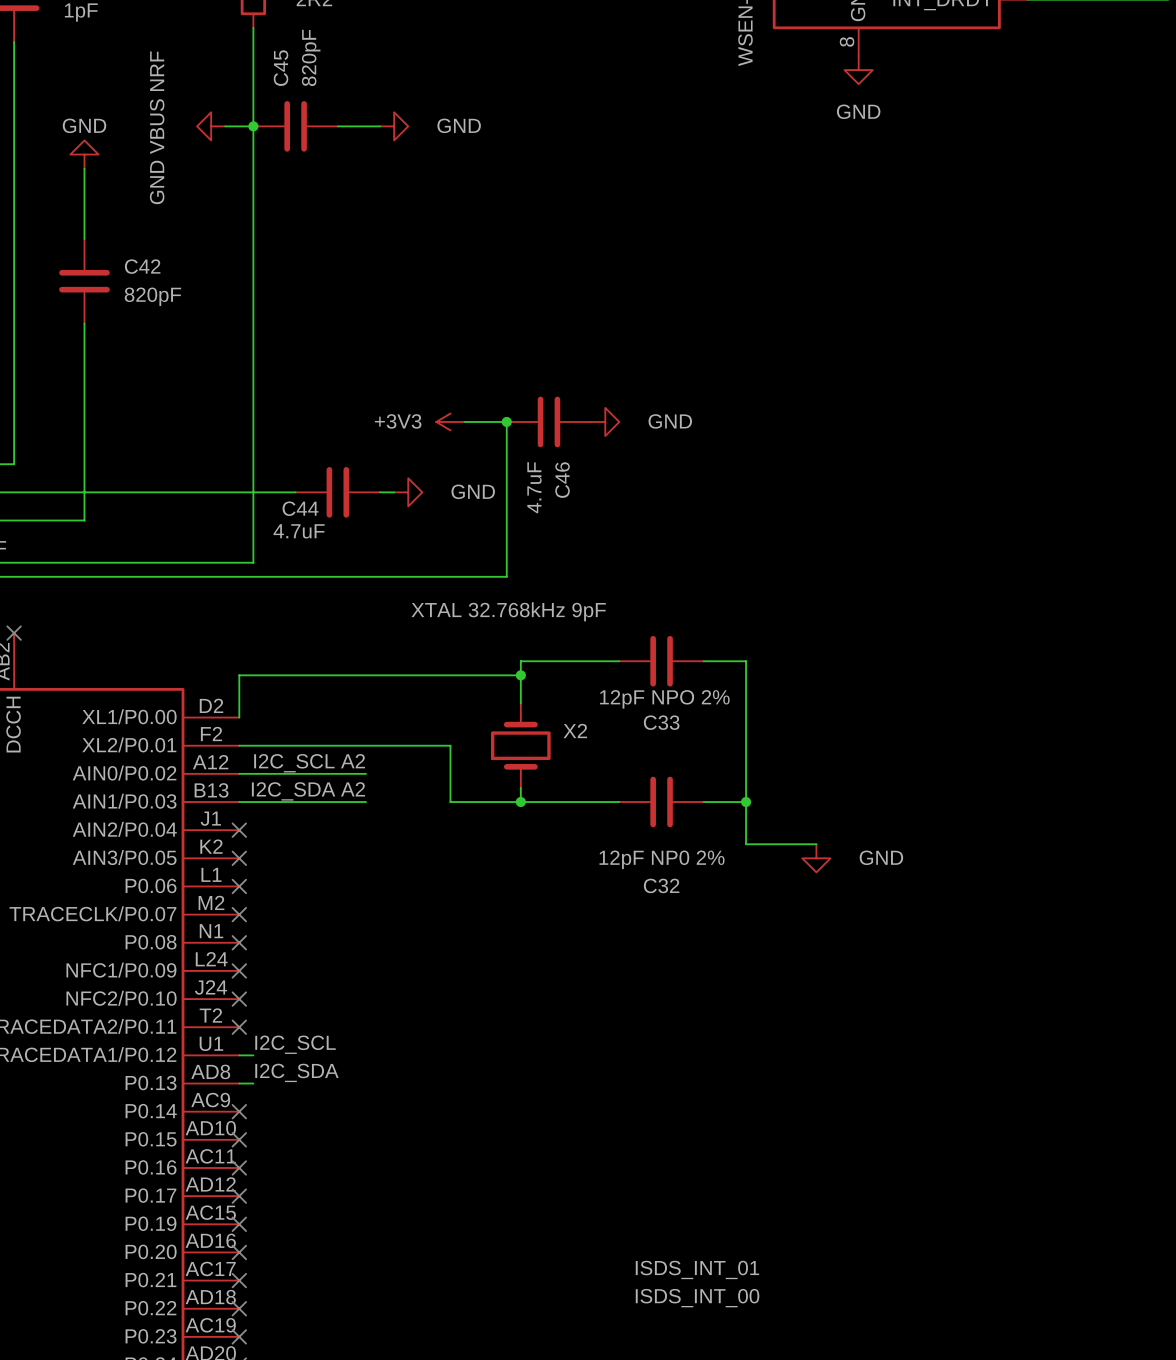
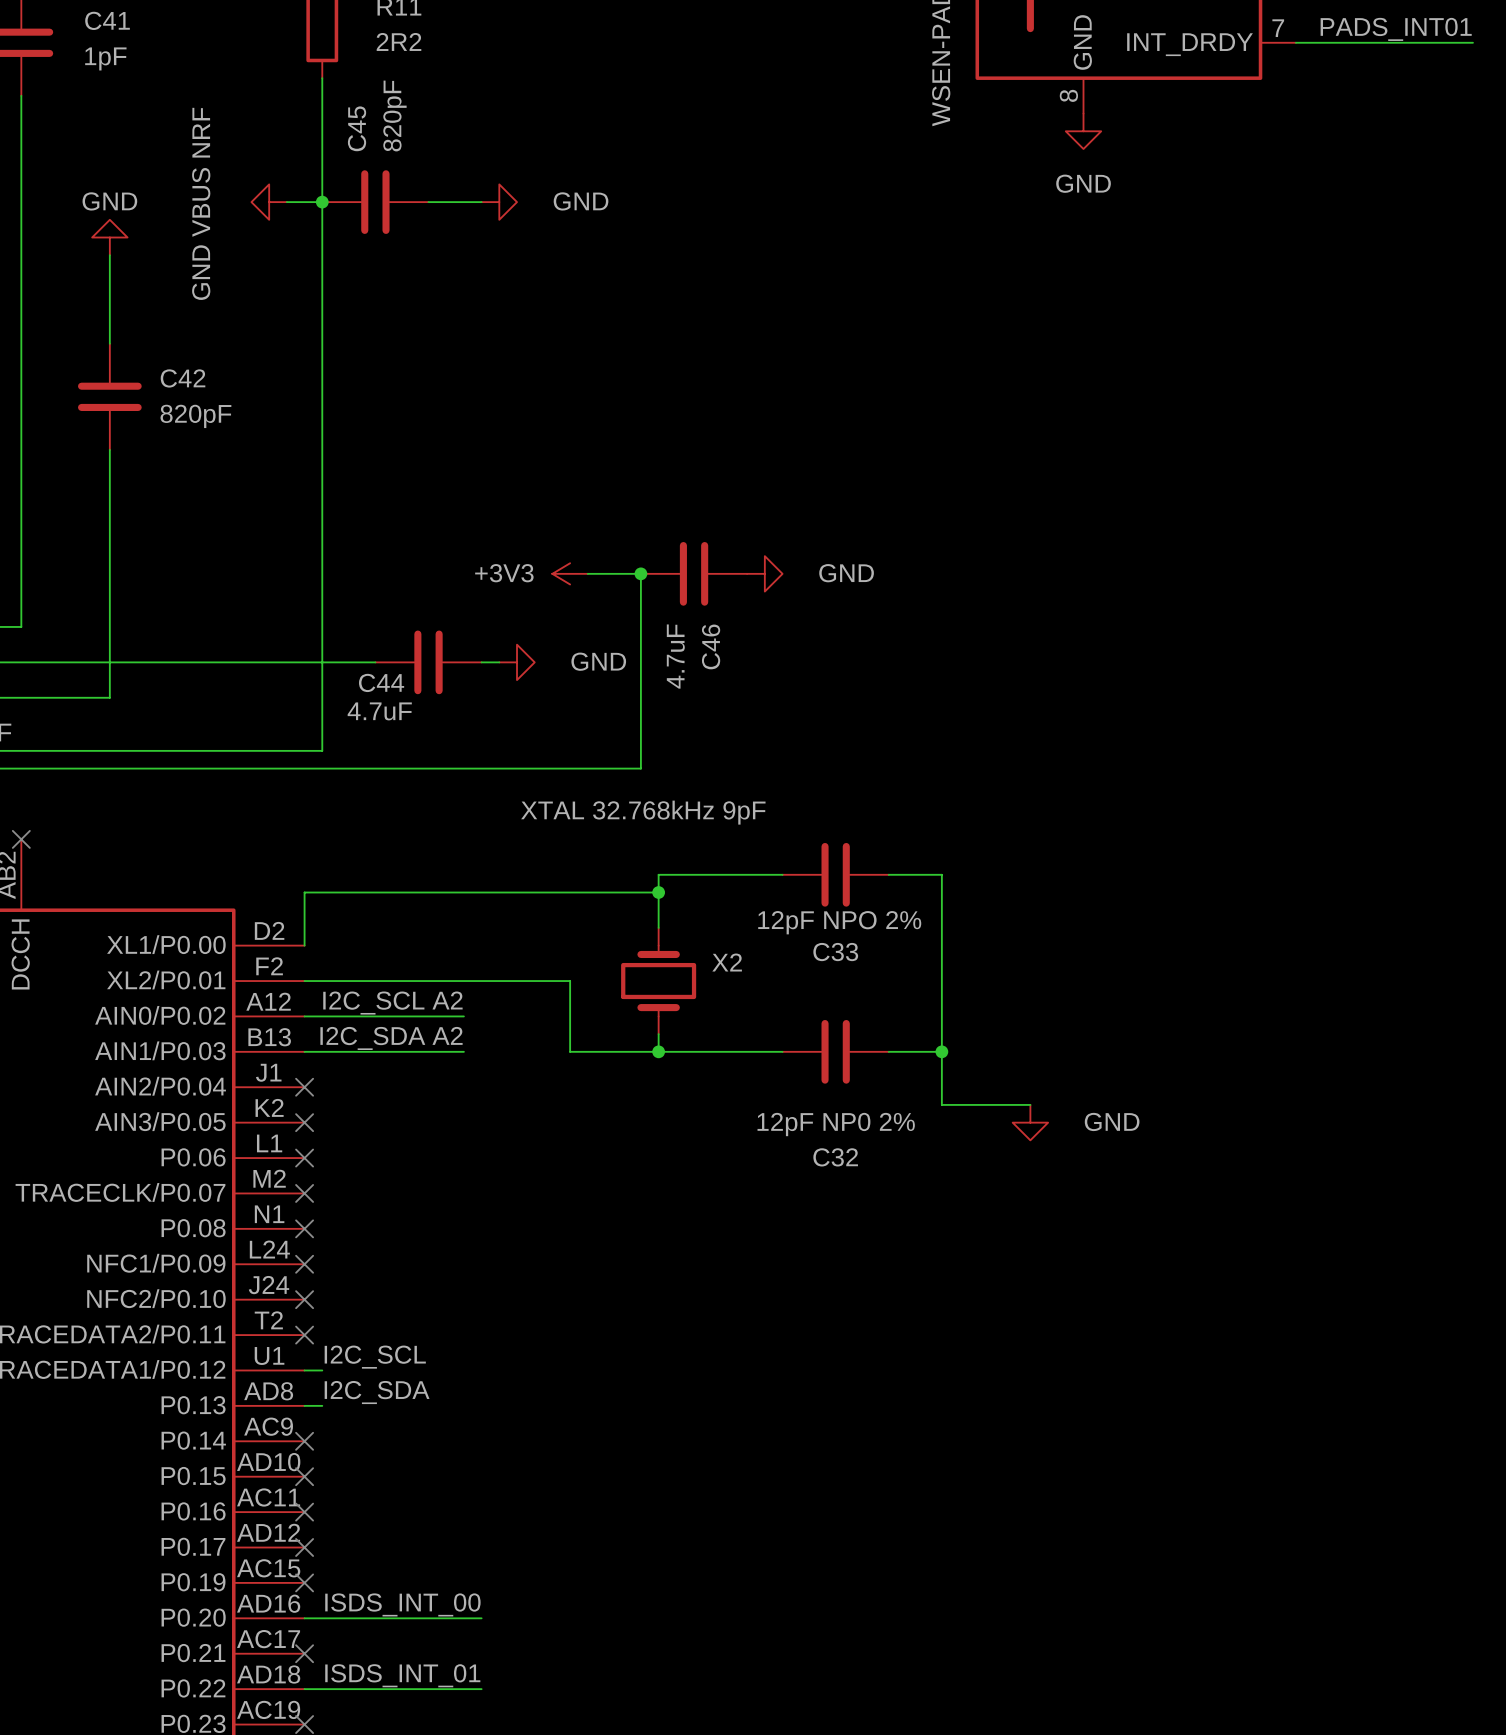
label: none -> ISDS_INT_00 (402, 1604)
wire: none -> (304, 1618) (481, 1618)
no-connect mark: (239, 1252) -> none
label: ISDS_INT_01 (697, 1269) -> none
label: none -> ISDS_INT_01 (402, 1675)
label: ISDS_INT_00 (697, 1298) -> none
wire: none -> (304, 1689) (481, 1689)
no-connect mark: (239, 1308) -> none

